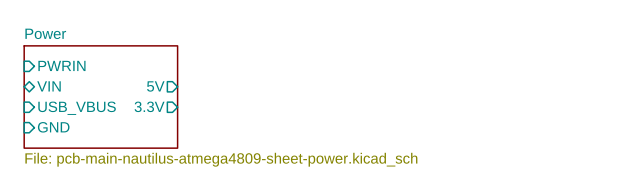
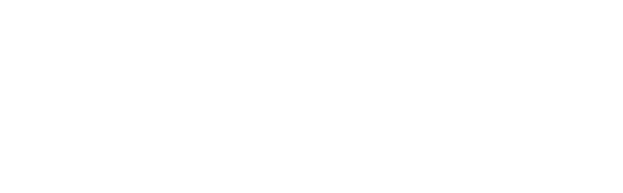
sheet pin: PWRIN (61, 65) -> none
sheet pin: VIN (48, 86) -> none
sheet pin: 5V (155, 86) -> none
sheet Power: File: pcb-main-nautilus-atmega4809-sheet-power.kicad_sch (100, 97) -> none
sheet pin: 3.3V (149, 106) -> none
sheet pin: USB_VBUS (77, 108) -> none
sheet pin: GND (53, 127) -> none

